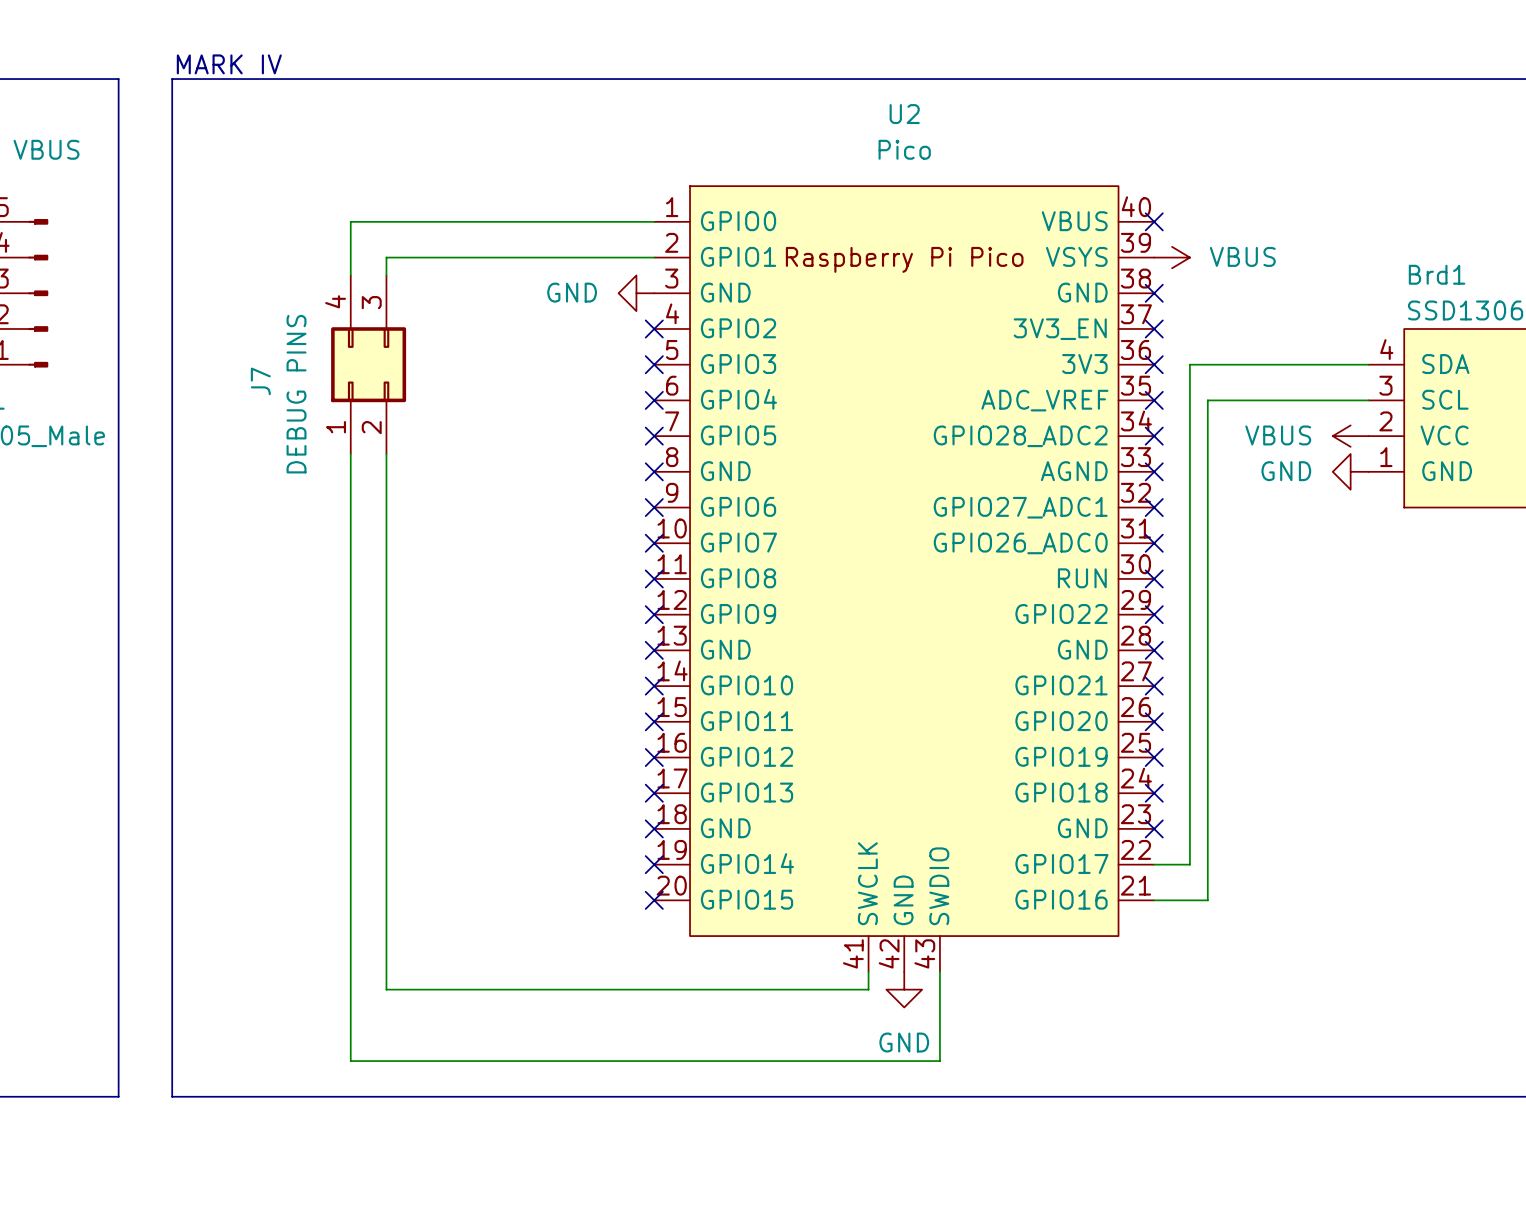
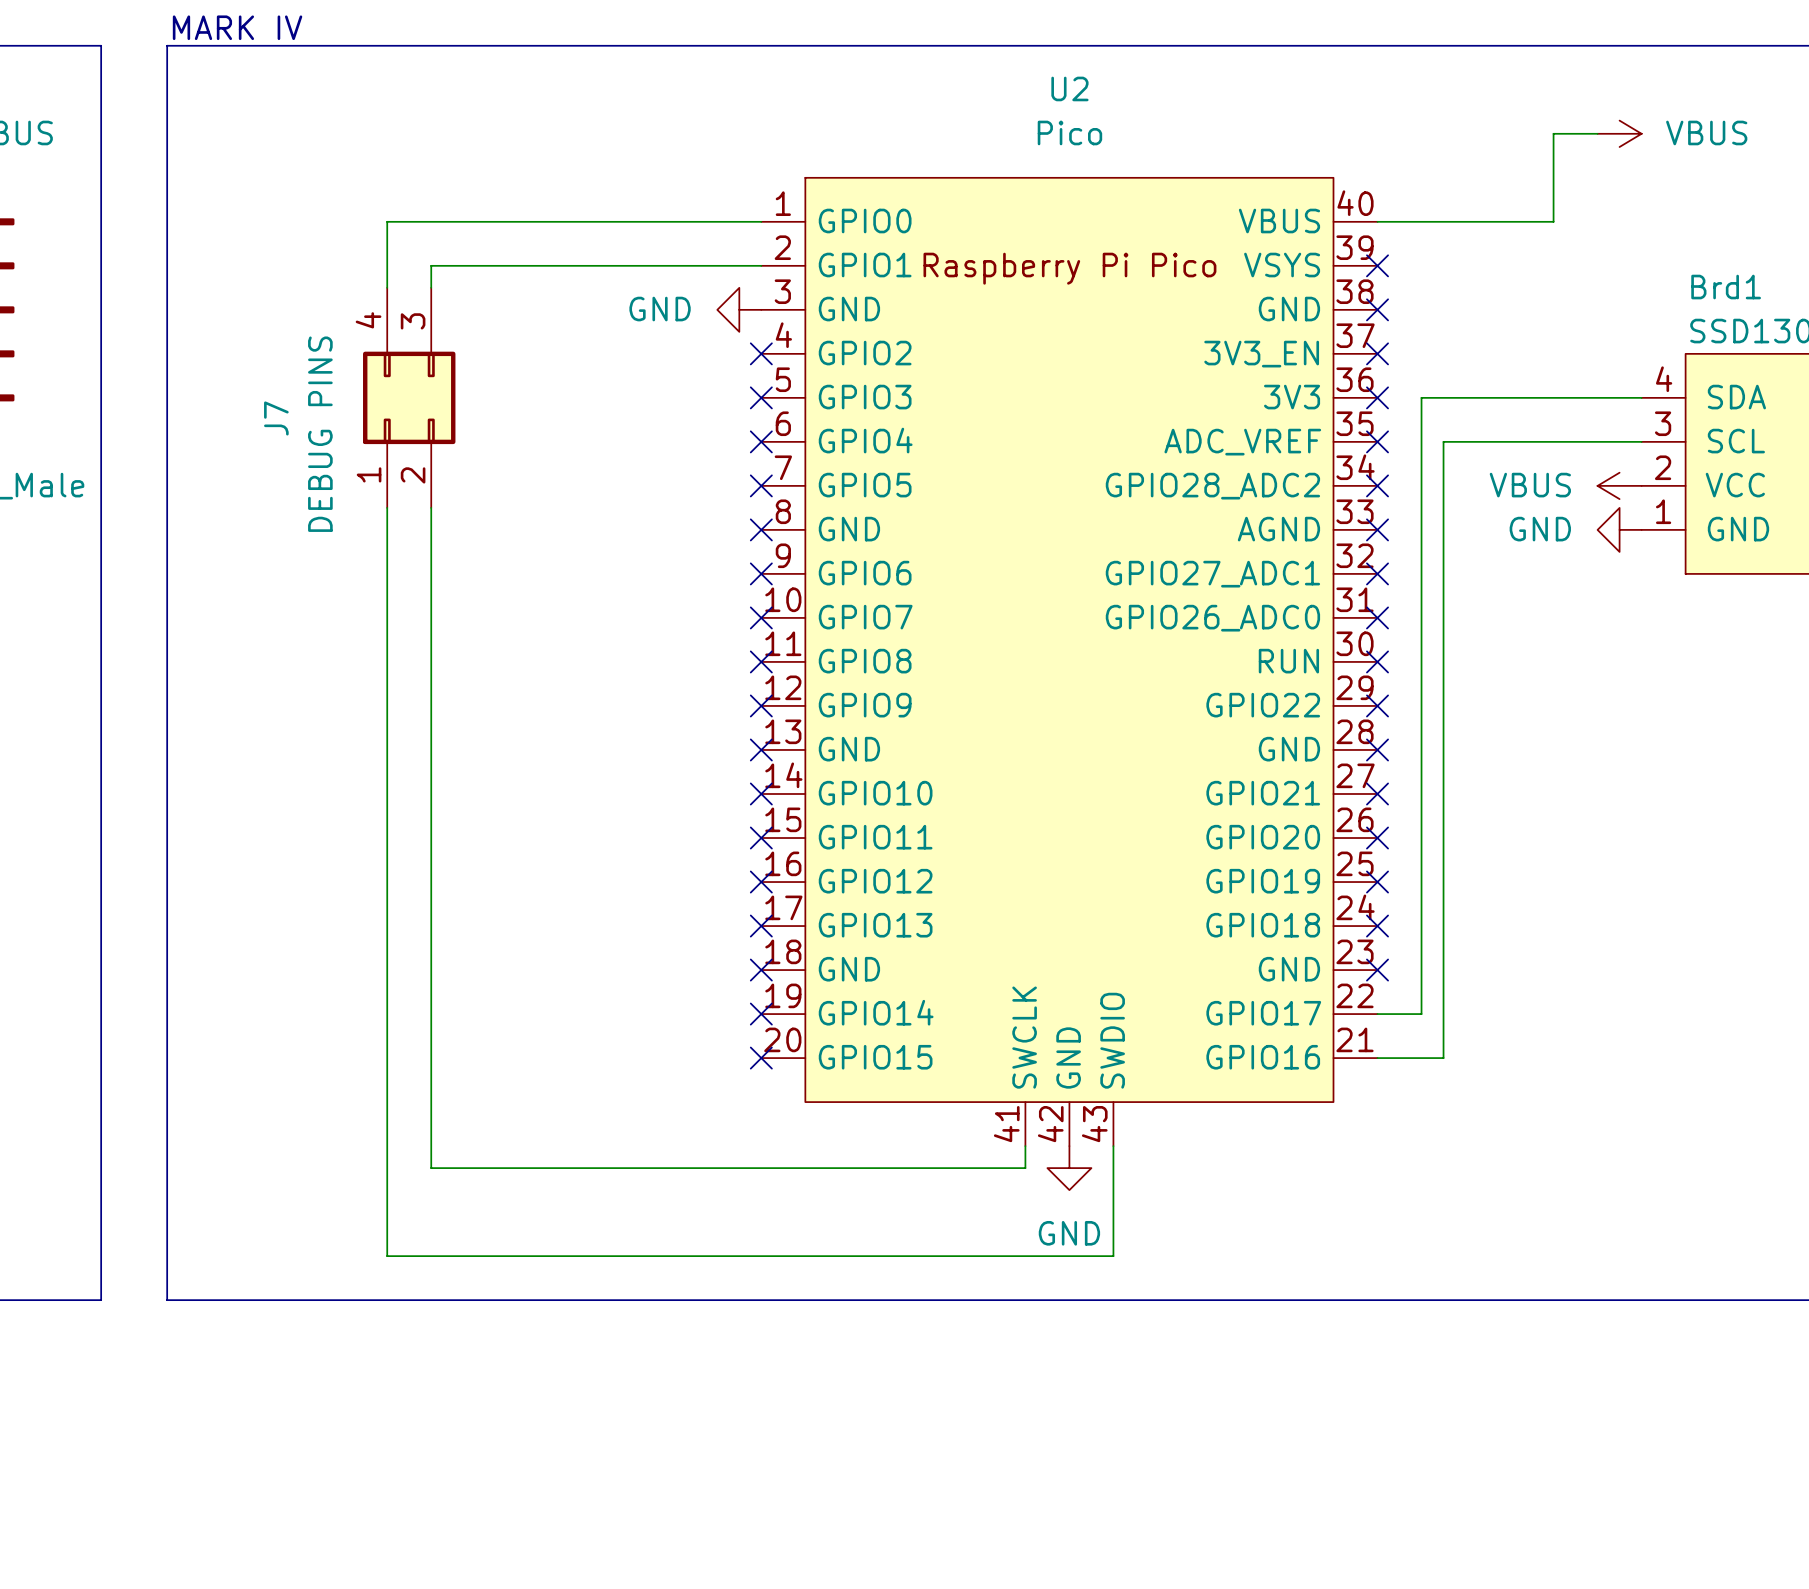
wire: none -> (1597, 133) (1553, 133) (1553, 221) (1377, 221)
no-connect mark position: (1154, 221) -> (1377, 265)
power symbol position: VBUS (1172, 257) -> VBUS (1619, 133)

